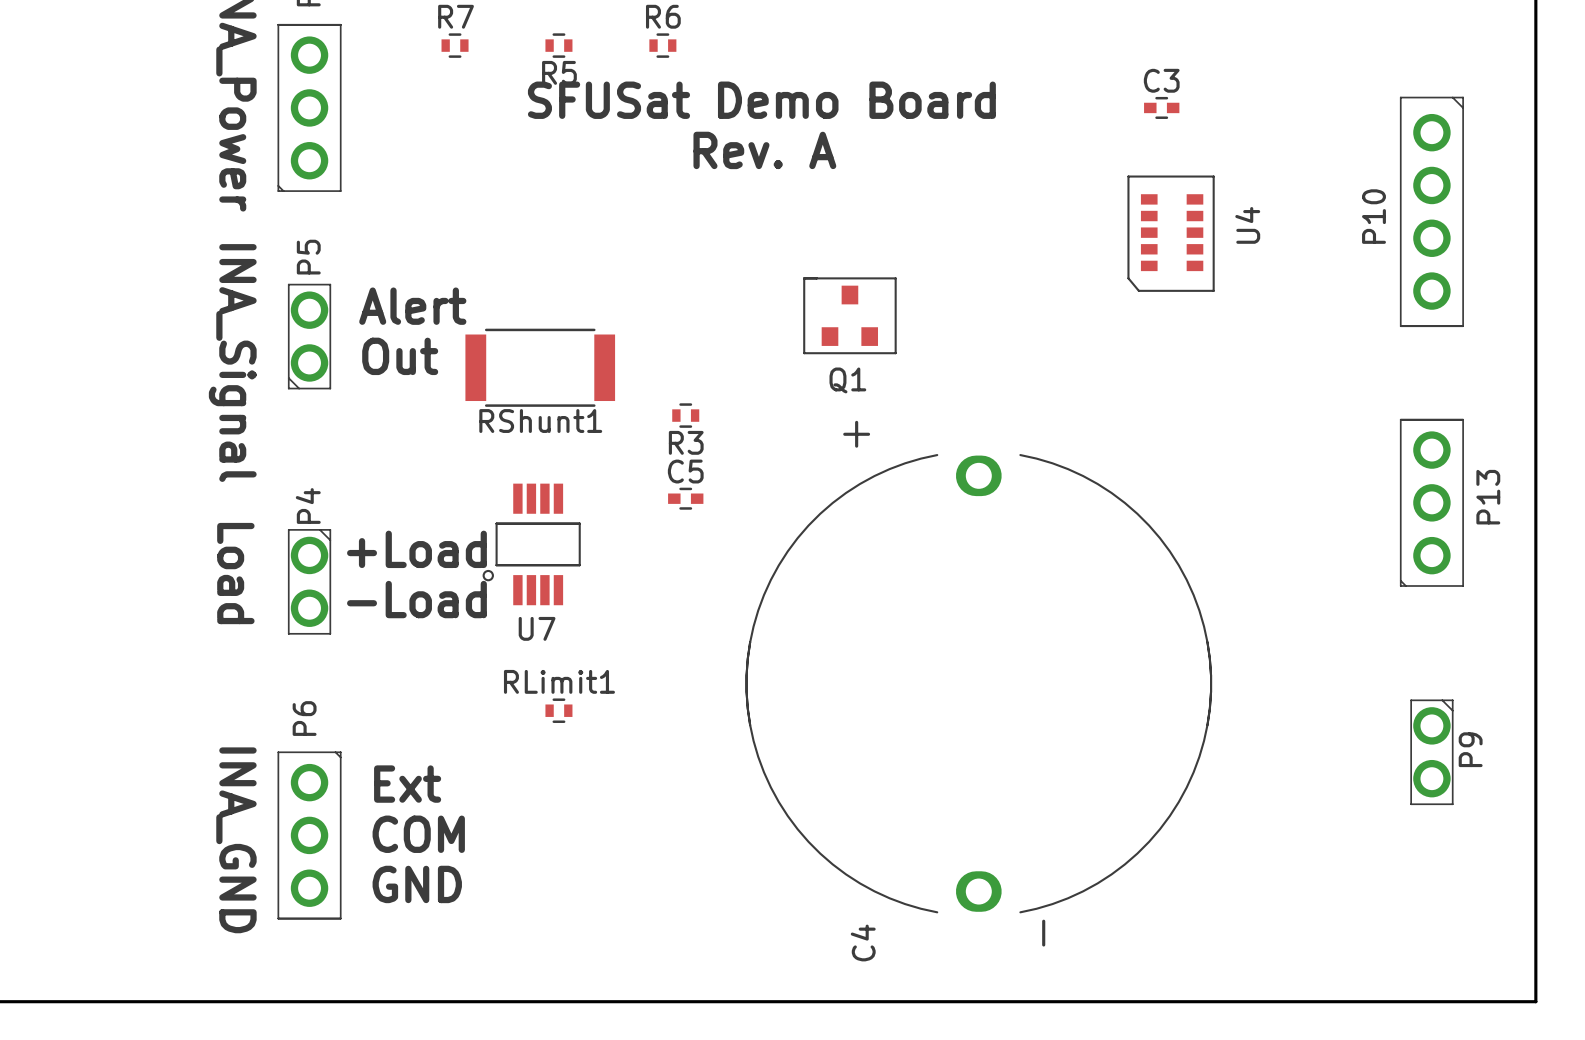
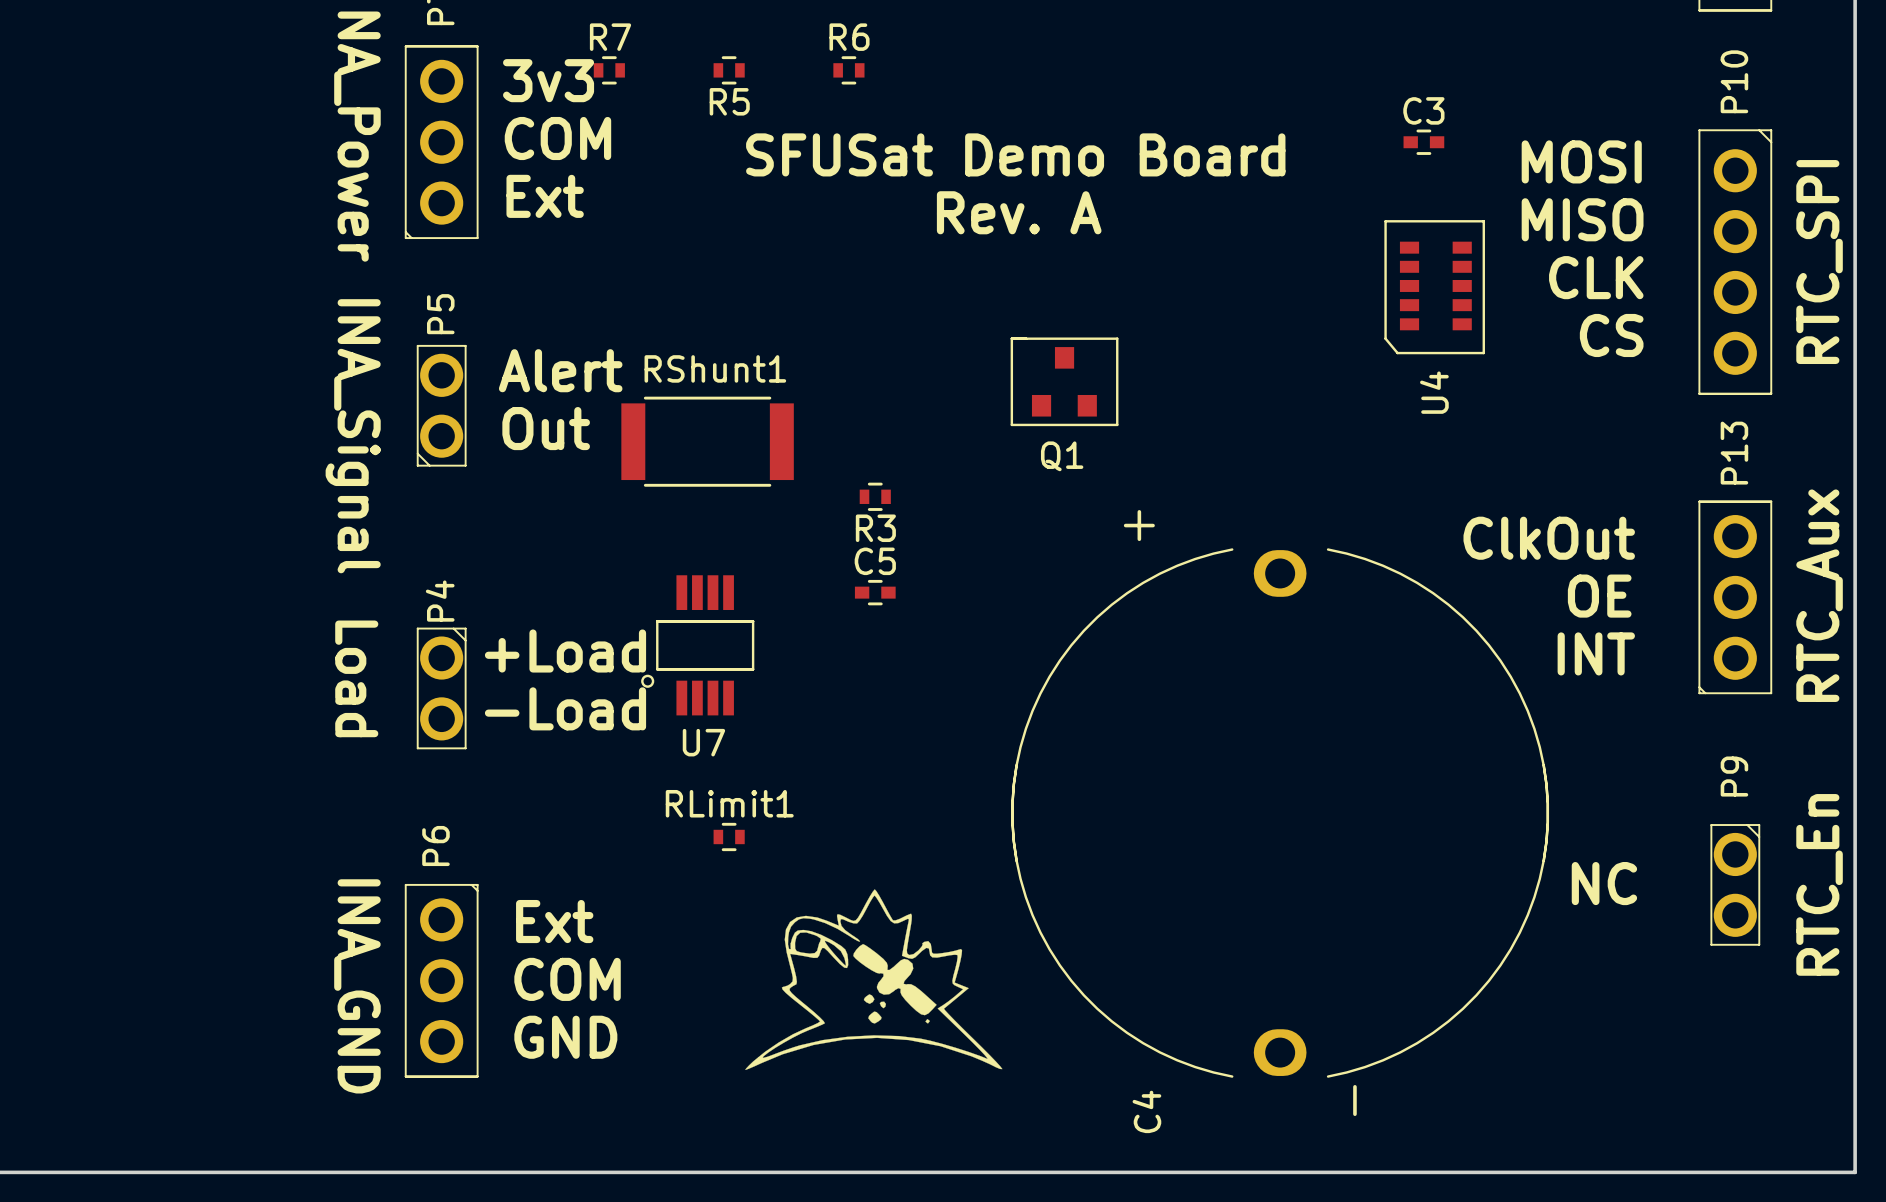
text: none -> 3v3 (548, 80)
text position: SFUSat Demo Board (761, 100) -> SFUSat Demo Board (1015, 154)
text: none -> COM (557, 138)
text: none -> MOSI (1581, 161)
text position: Rev. A (764, 150) -> Rev. A (1019, 212)
text: none -> Ext (545, 196)
text: none -> MISO (1582, 219)
text: none -> RTC_SPI (1819, 262)
P10 name position: P10 (1373, 216) -> P10 (1734, 81)
U4 name position: U4 (1247, 225) -> U4 (1434, 392)
text: none -> CLK (1596, 277)
text: none -> CS (1611, 335)
RShunt1 name position: RShunt1 (540, 421) -> RShunt1 (715, 368)
text: none -> ClkOut (1549, 538)
P13 name position: P13 (1488, 497) -> P13 (1734, 453)
text: none -> OE (1599, 596)
text: none -> RTC_Aux (1819, 595)
text: none -> INT (1596, 653)
C4 position: (978, 683) -> (1280, 813)
P9 name position: P9 (1470, 749) -> P9 (1734, 776)
text: none -> NC (1604, 883)
text: none -> RTC_En (1819, 884)
drawing: none -> [745, 889, 1003, 1071]

